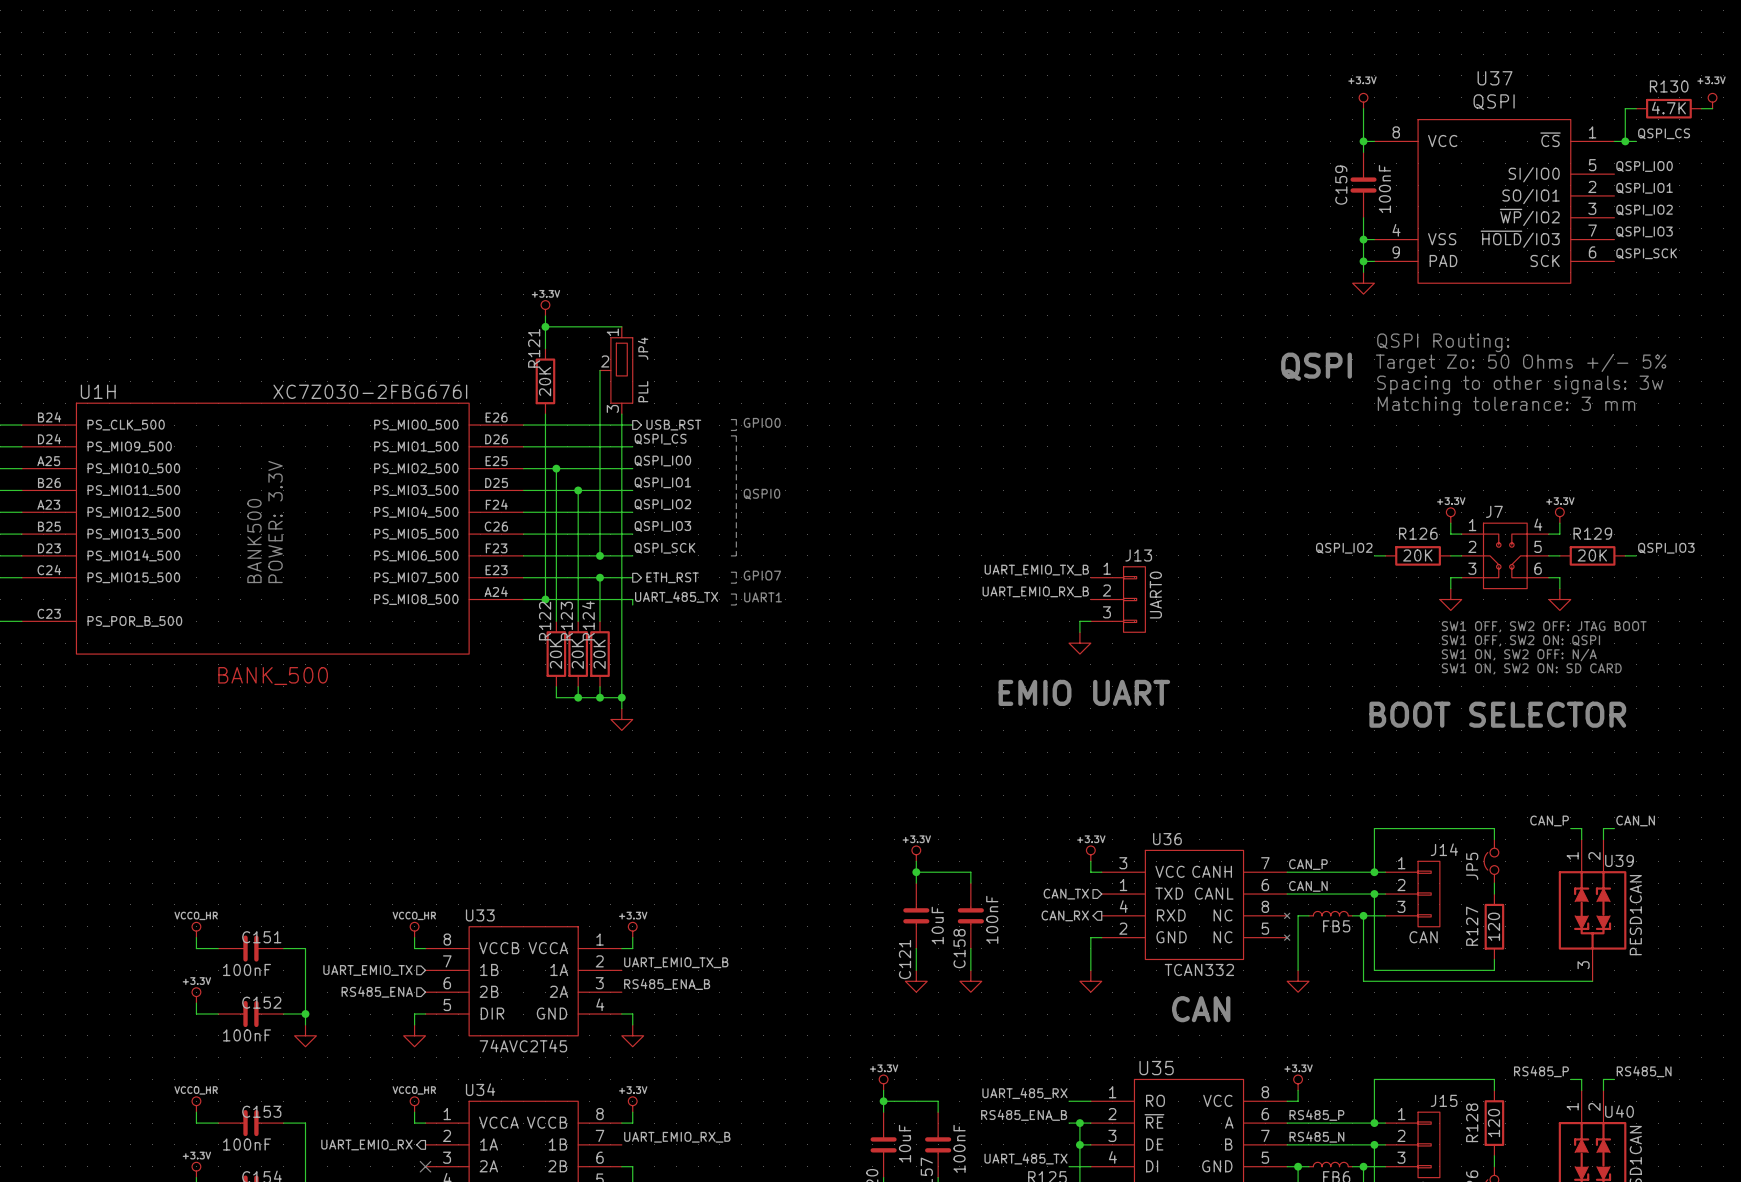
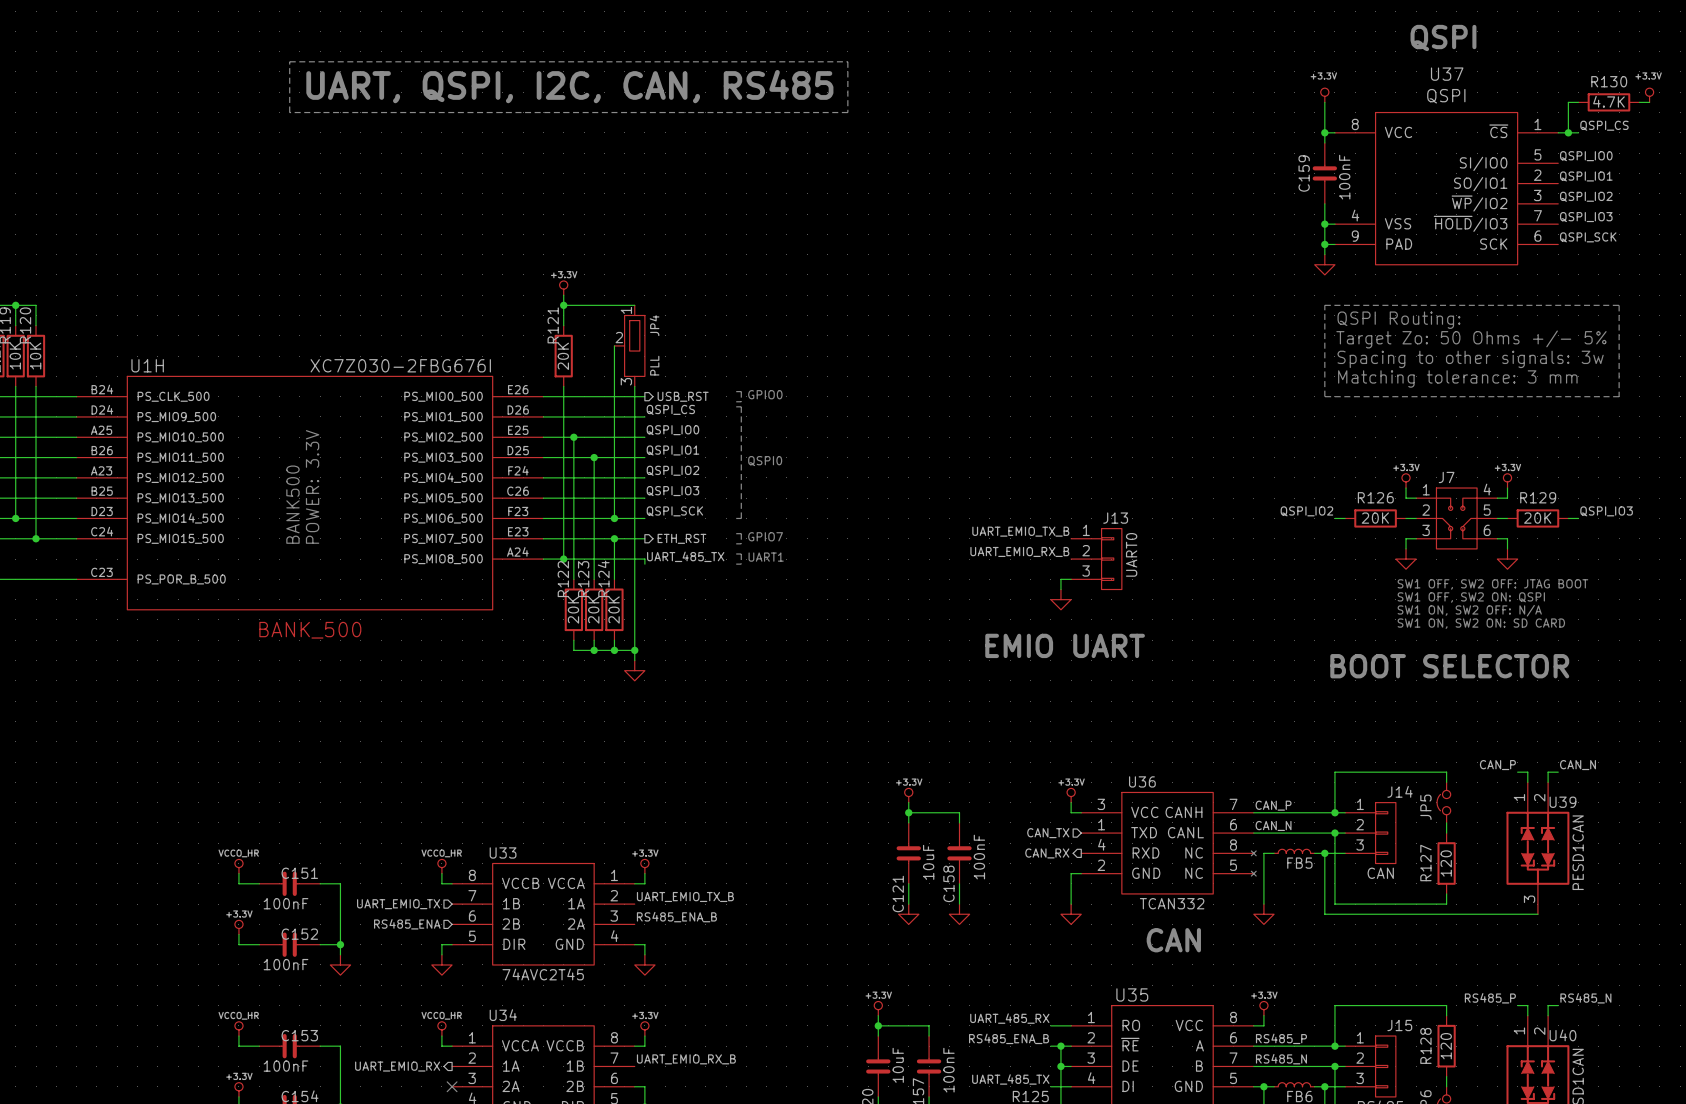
text: none -> QSPI (1443, 37)
line: none -> (289, 61) (847, 61) (847, 112) (289, 112) (289, 61)
text: none -> UART, QSPI, I2C, CAN, RS485 (569, 86)
line: none -> (1324, 305) (1619, 305) (1619, 396) (1324, 396) (1324, 305)
text: QSPI (1316, 366) -> none

